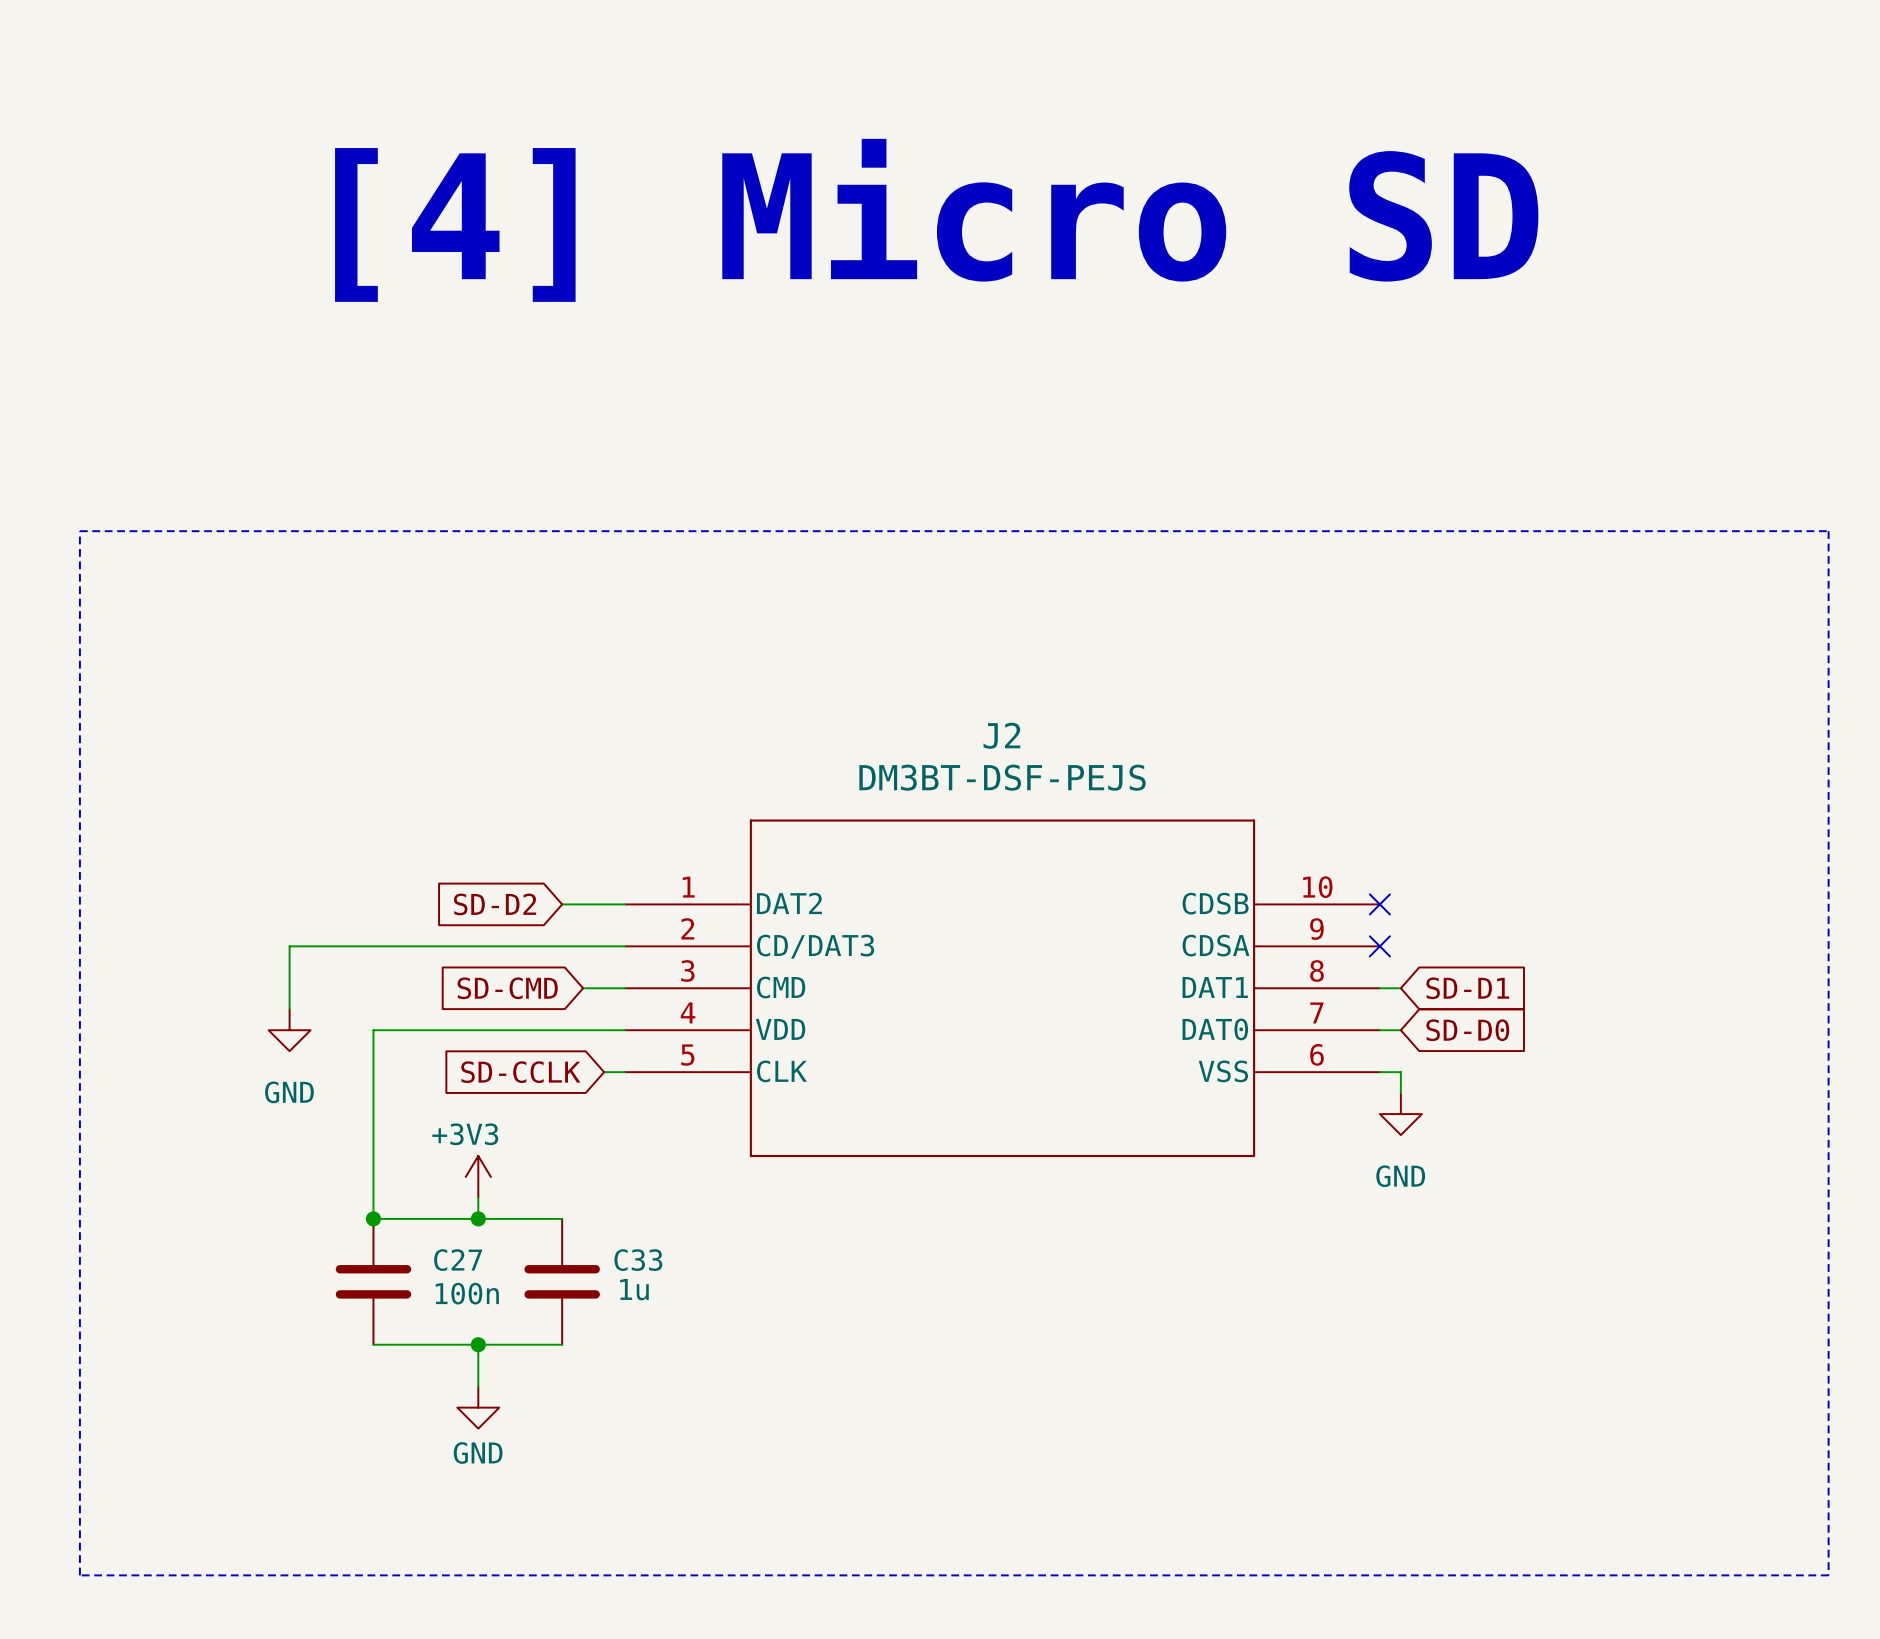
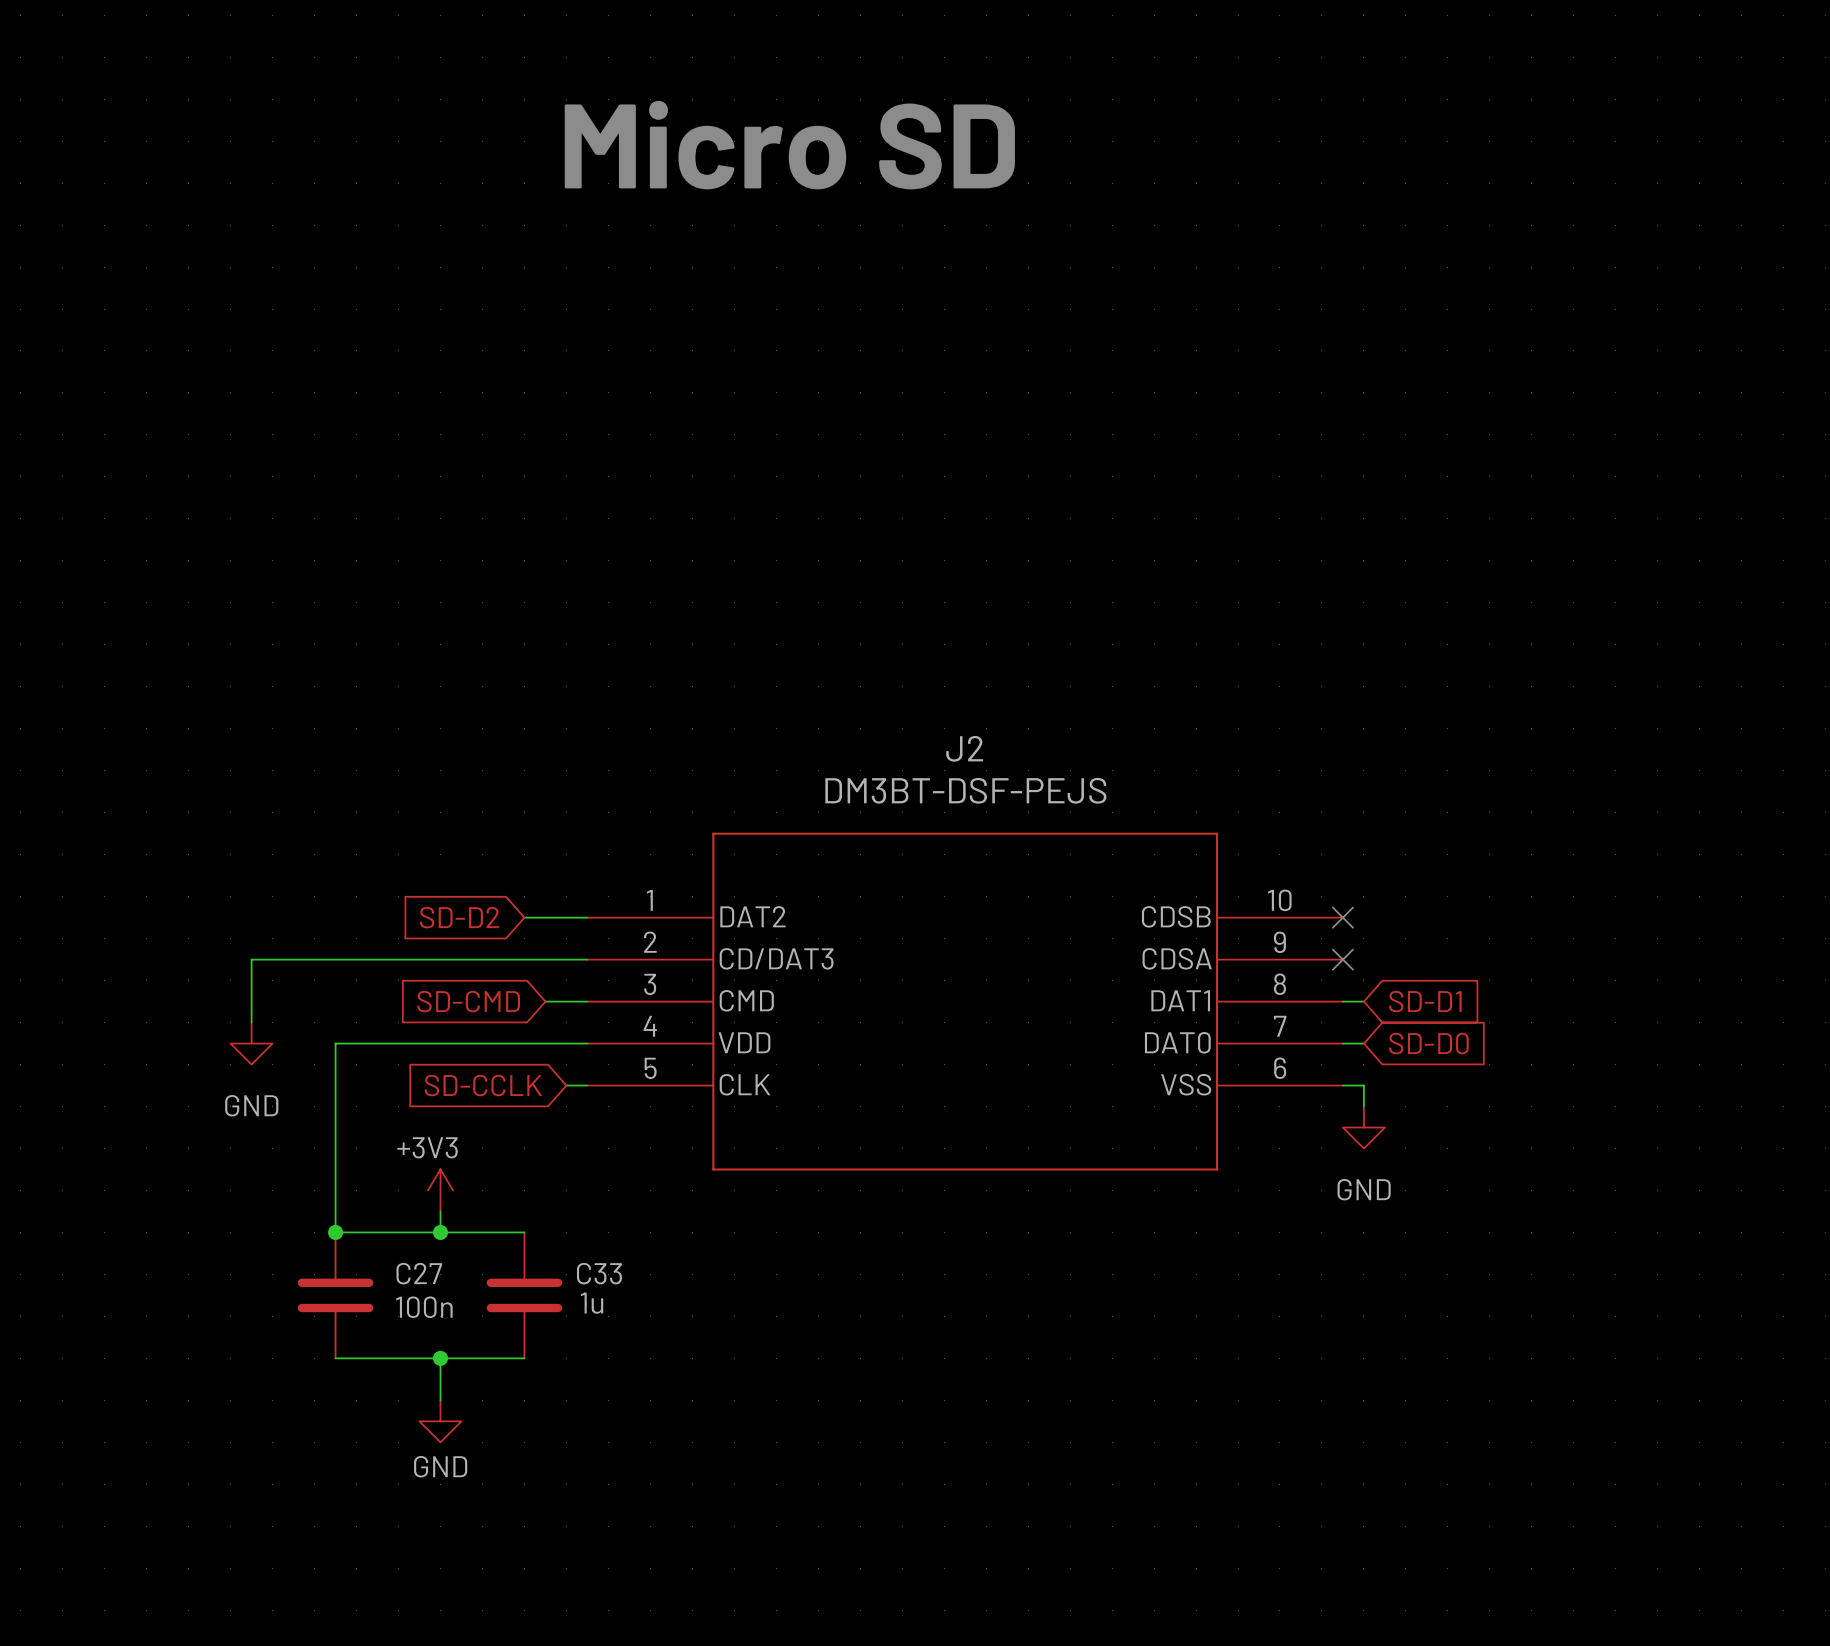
text: [4] Micro SD (936, 220) -> Micro SD (789, 145)
line: (79, 531) (1828, 531) (1828, 1575) (79, 1575) (79, 531) -> none

